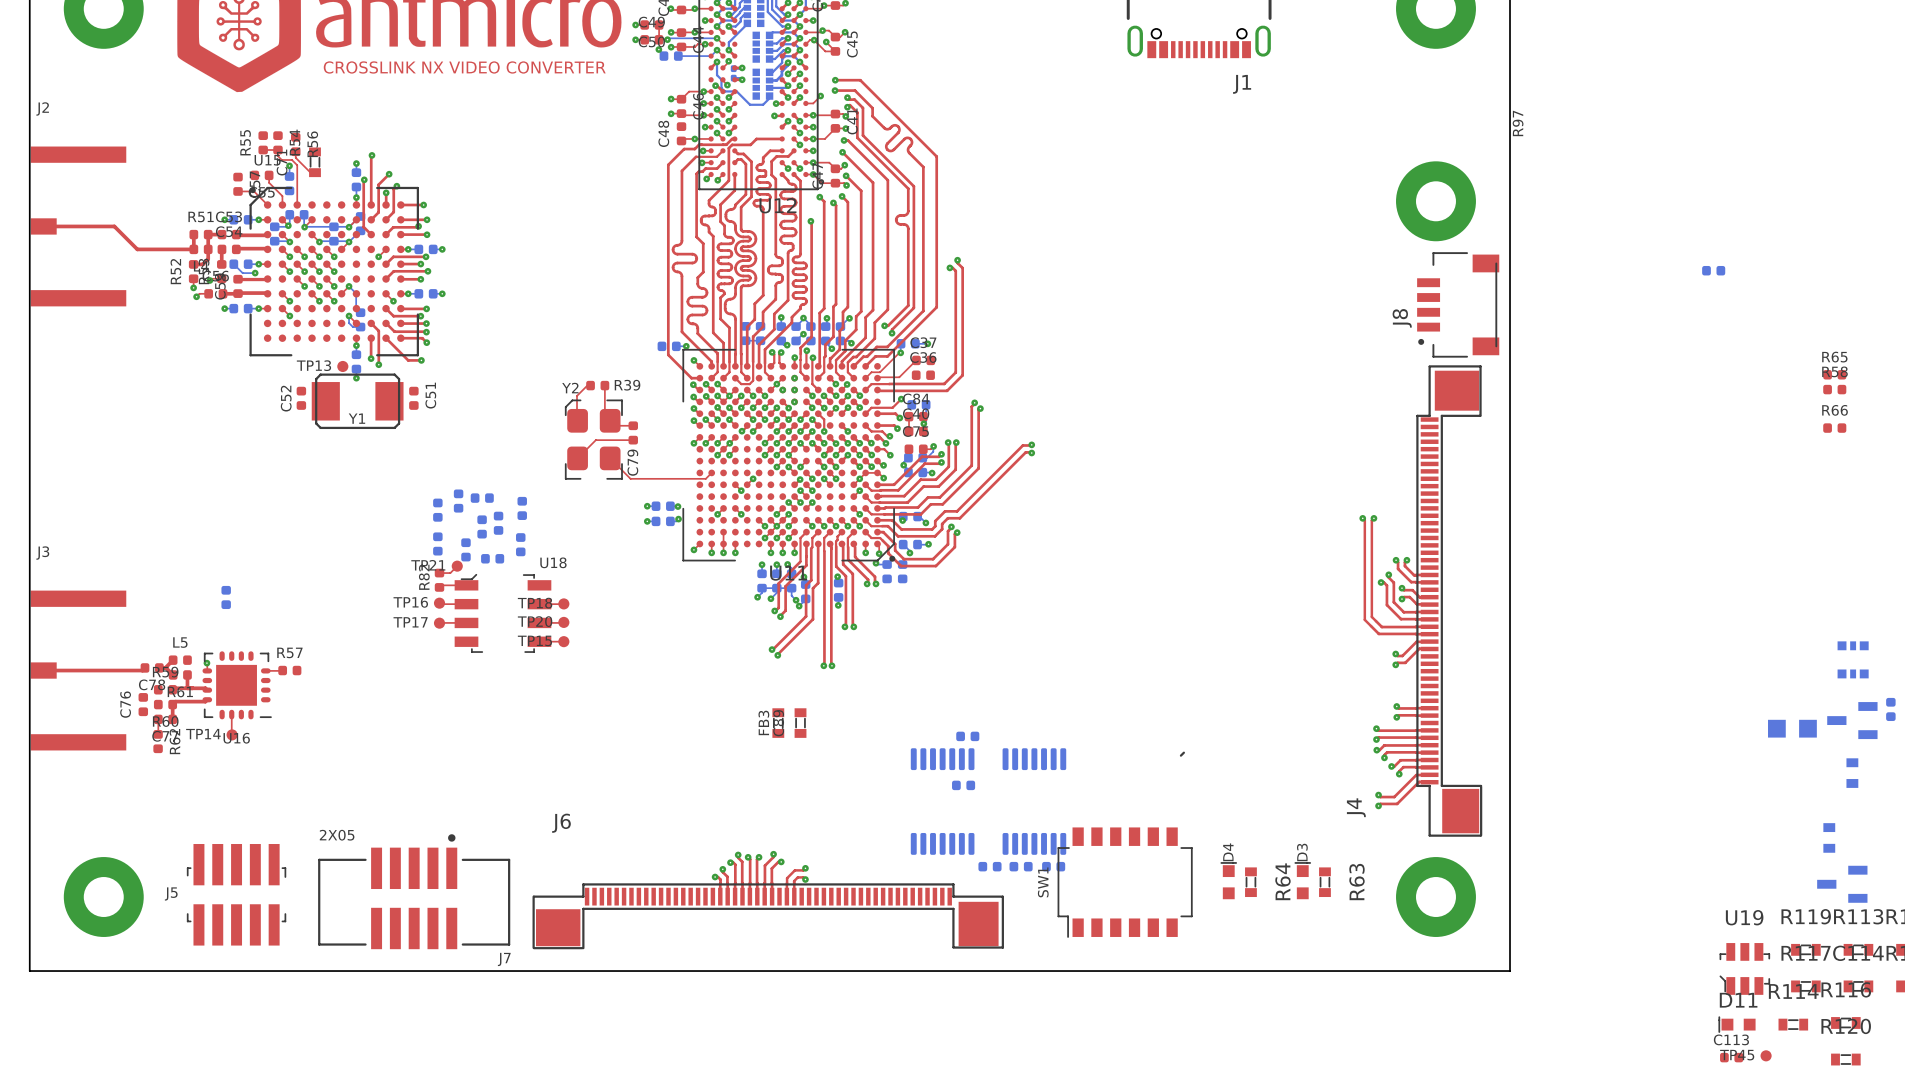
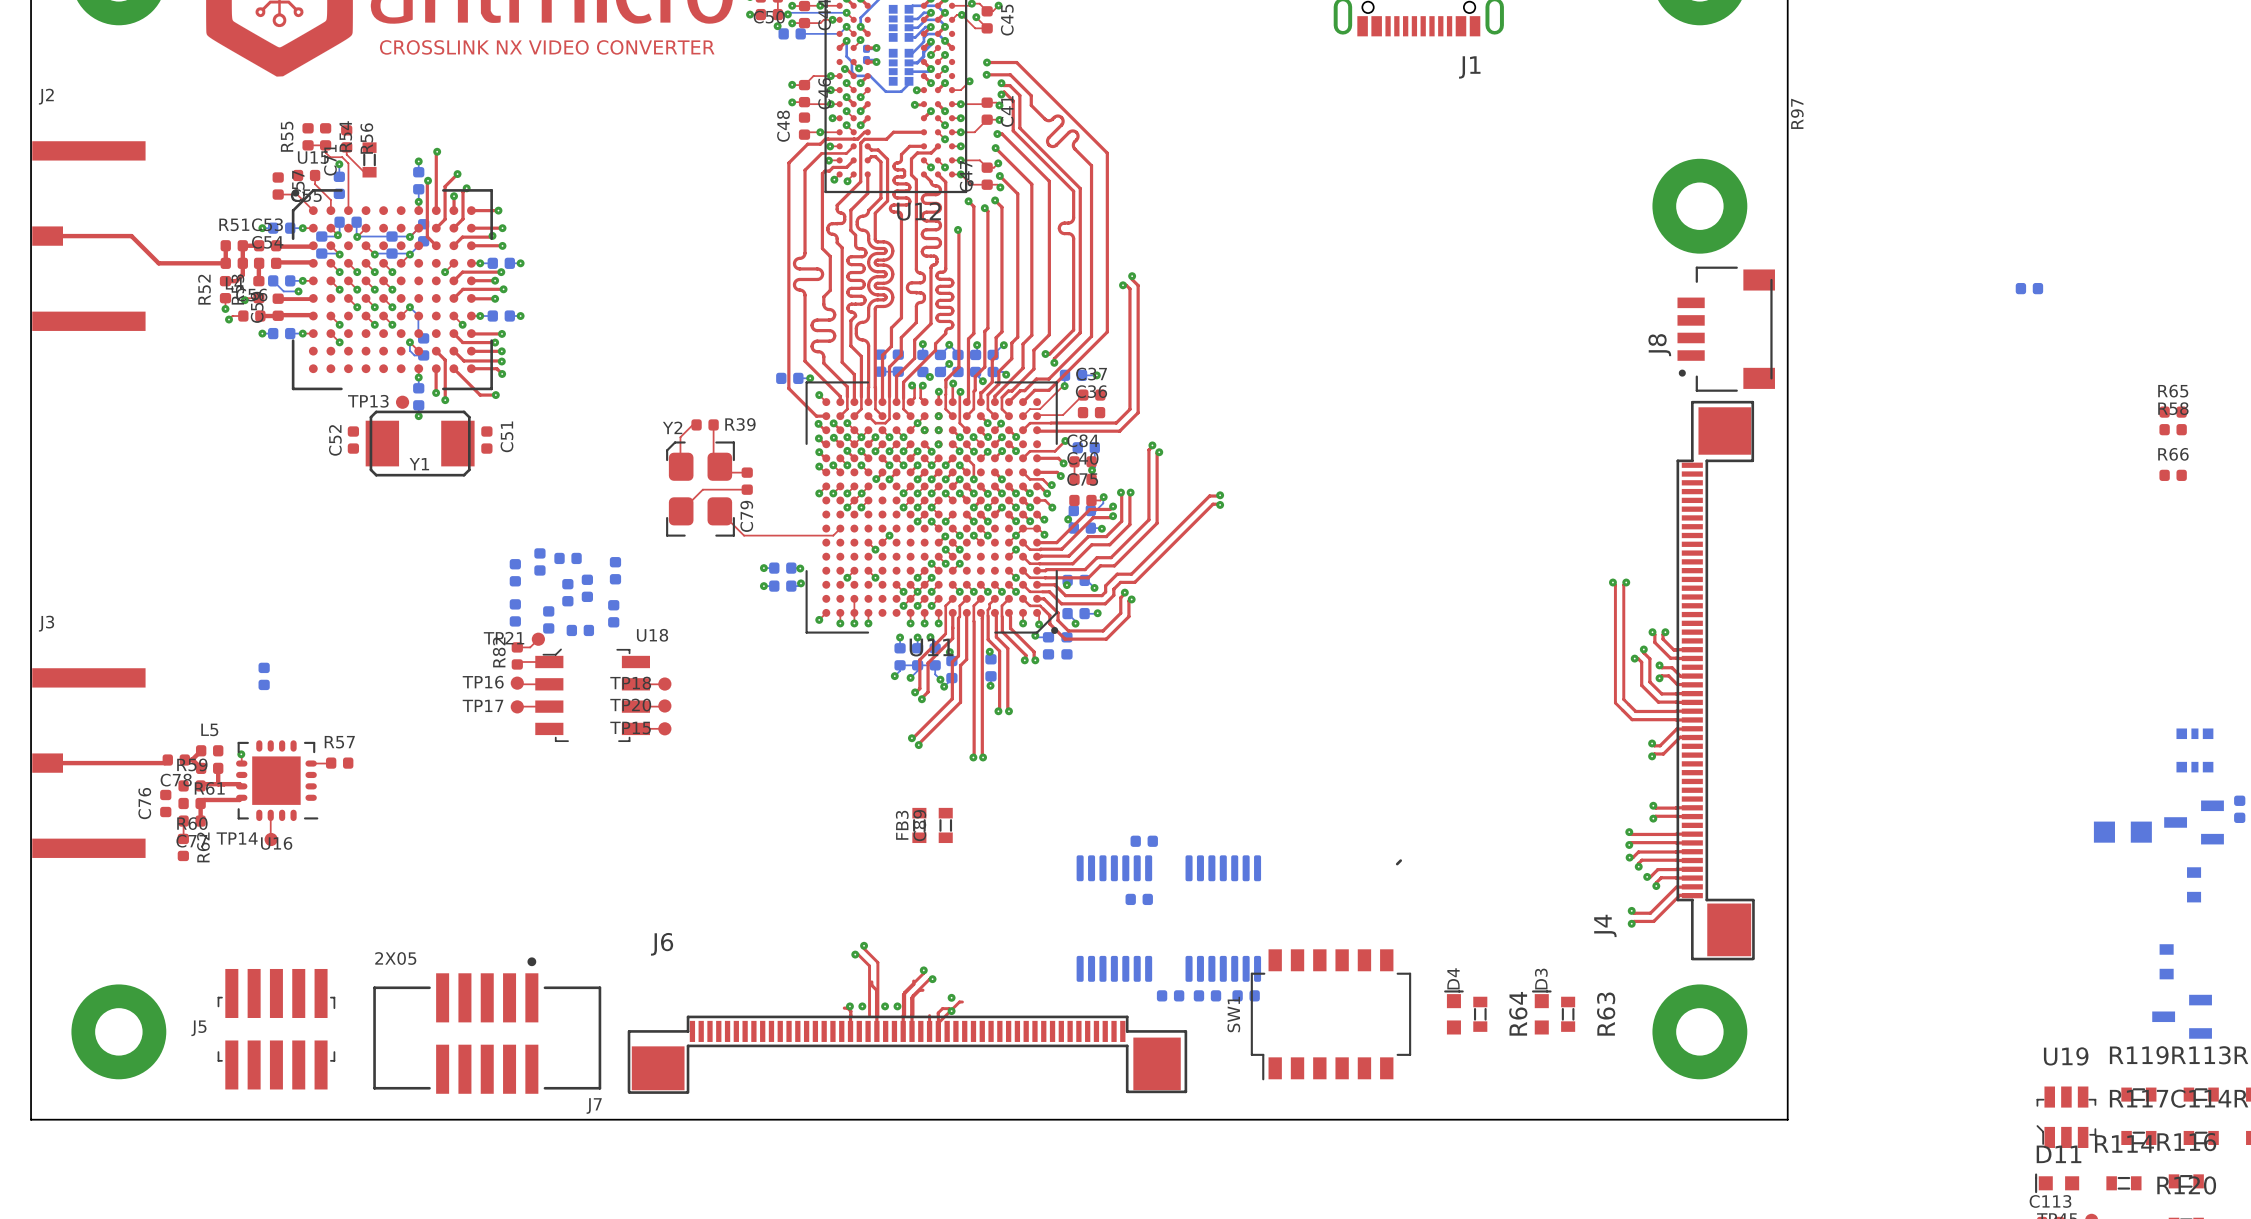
top track: none -> (864, 945) (864, 948) (877, 962) (877, 1015)
via: none -> (864, 945)
top track: none -> (855, 954) (858, 954) (869, 965) (869, 1015)
via: none -> (855, 954)
top track: none -> (923, 970) (923, 973) (904, 992) (904, 1015)
via: none -> (923, 970)
top track: none -> (932, 979) (929, 979) (913, 995) (913, 1015)
via: none -> (932, 979)
via: (738, 854) -> none
via: (773, 854) -> none
top track: (748, 857) (750, 859) (749, 896) -> none
via: (748, 857) -> none
top track: (759, 857) (757, 859) (757, 896) -> none
via: (759, 857) -> none
via: (781, 861) -> none
top track: (730, 862) (735, 864) (735, 896) -> none
via: (730, 862) -> none
top track: (805, 868) (803, 870) (794, 870) (787, 878) (787, 883) -> none
top track: (722, 869) (727, 876) (727, 896) -> none
via: (722, 869) -> none
top track: none -> (962, 1002) (959, 1002) (939, 1023)
via: none -> (849, 1006)
via: none -> (862, 1006)
via: none -> (885, 1006)
via: none -> (897, 1006)
via: (715, 877) -> none

